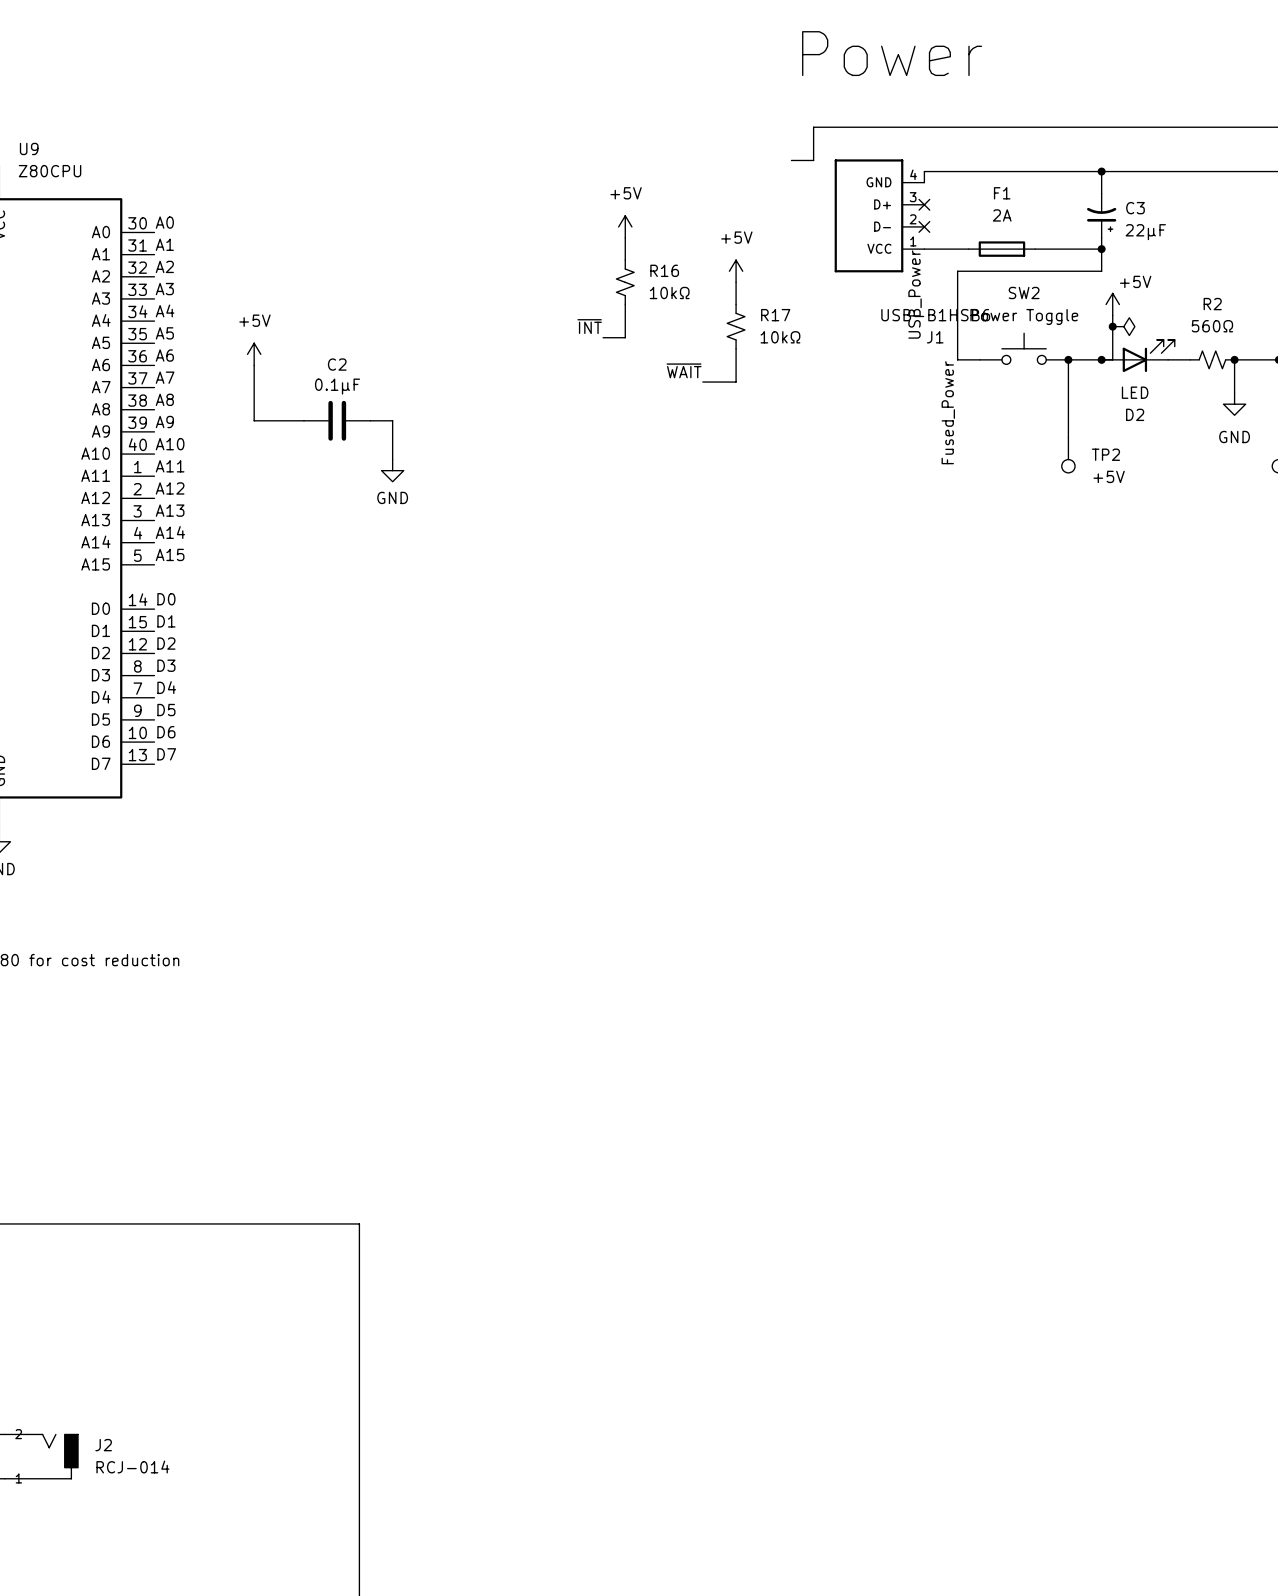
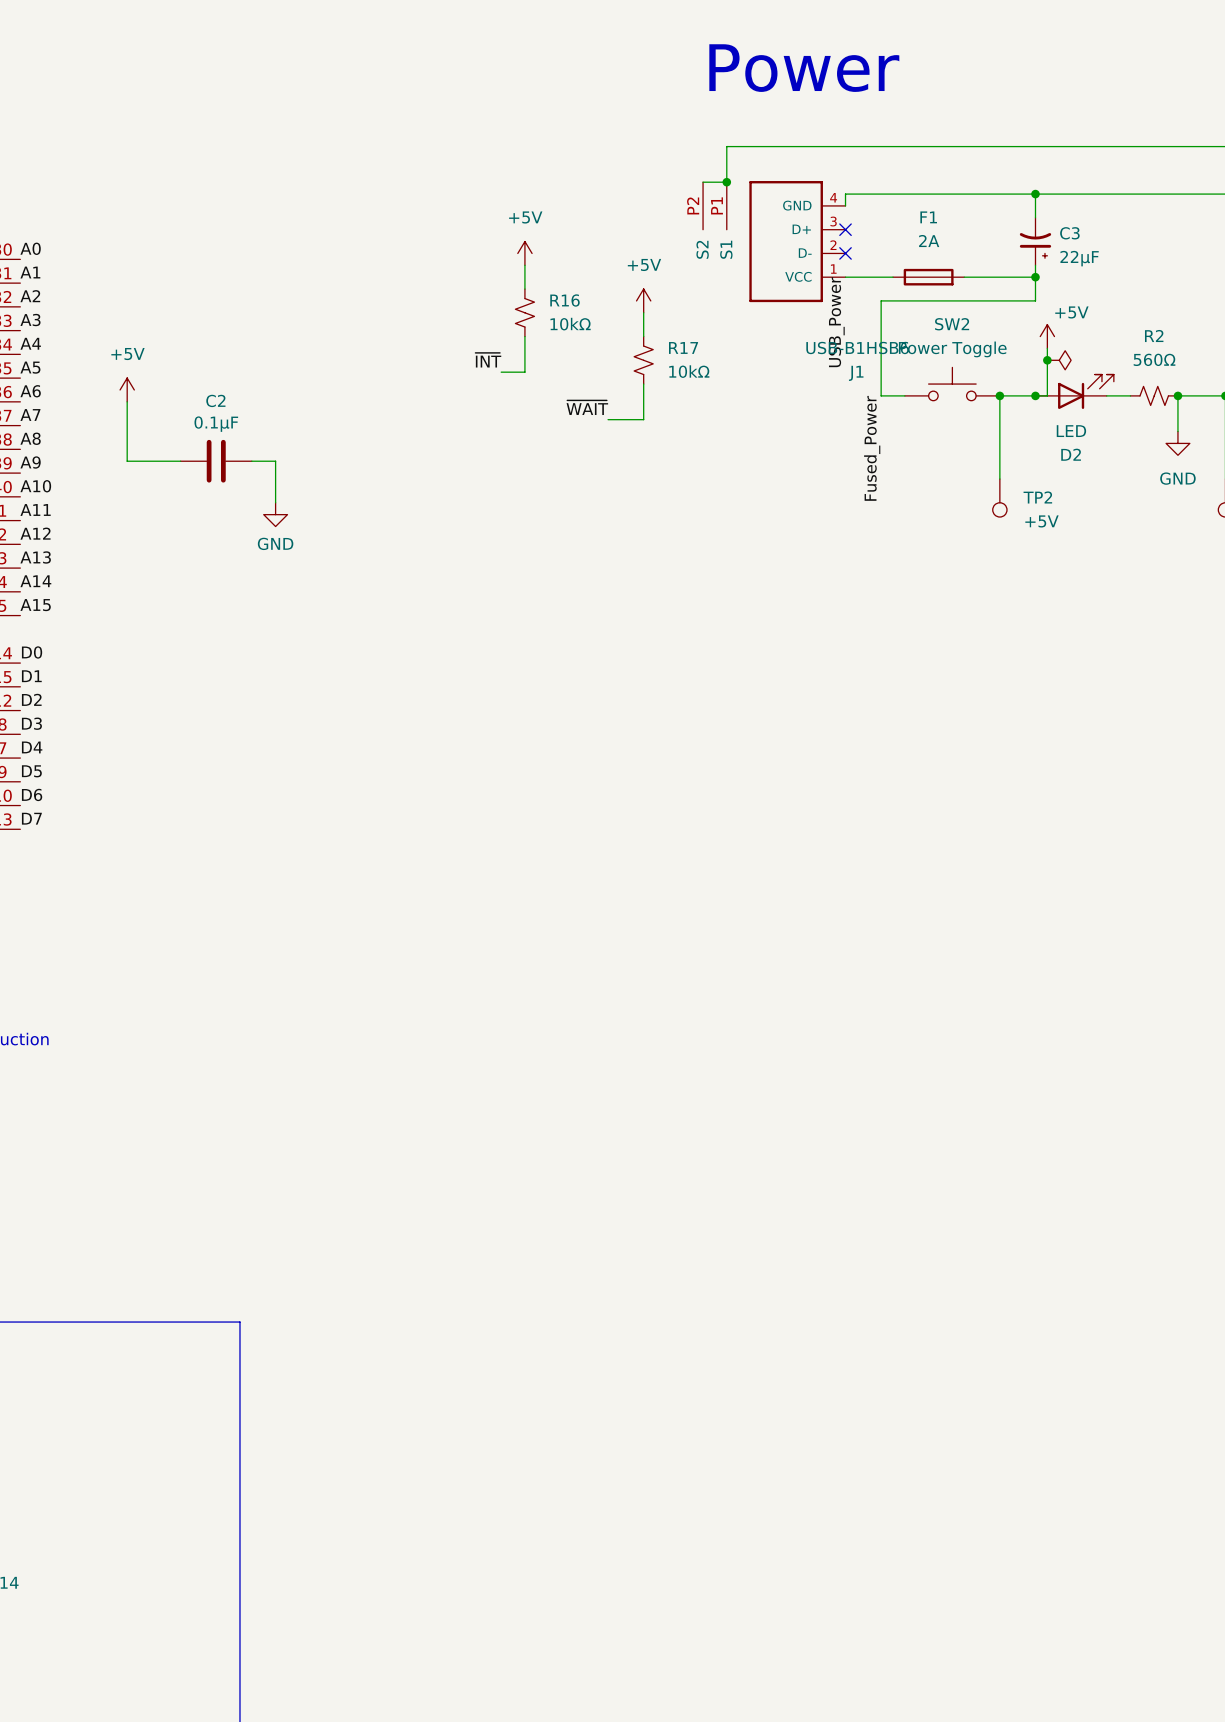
J1 symbol: [834, 159, 925, 273] -> [703, 181, 846, 303]
junction: none -> (726, 182)

